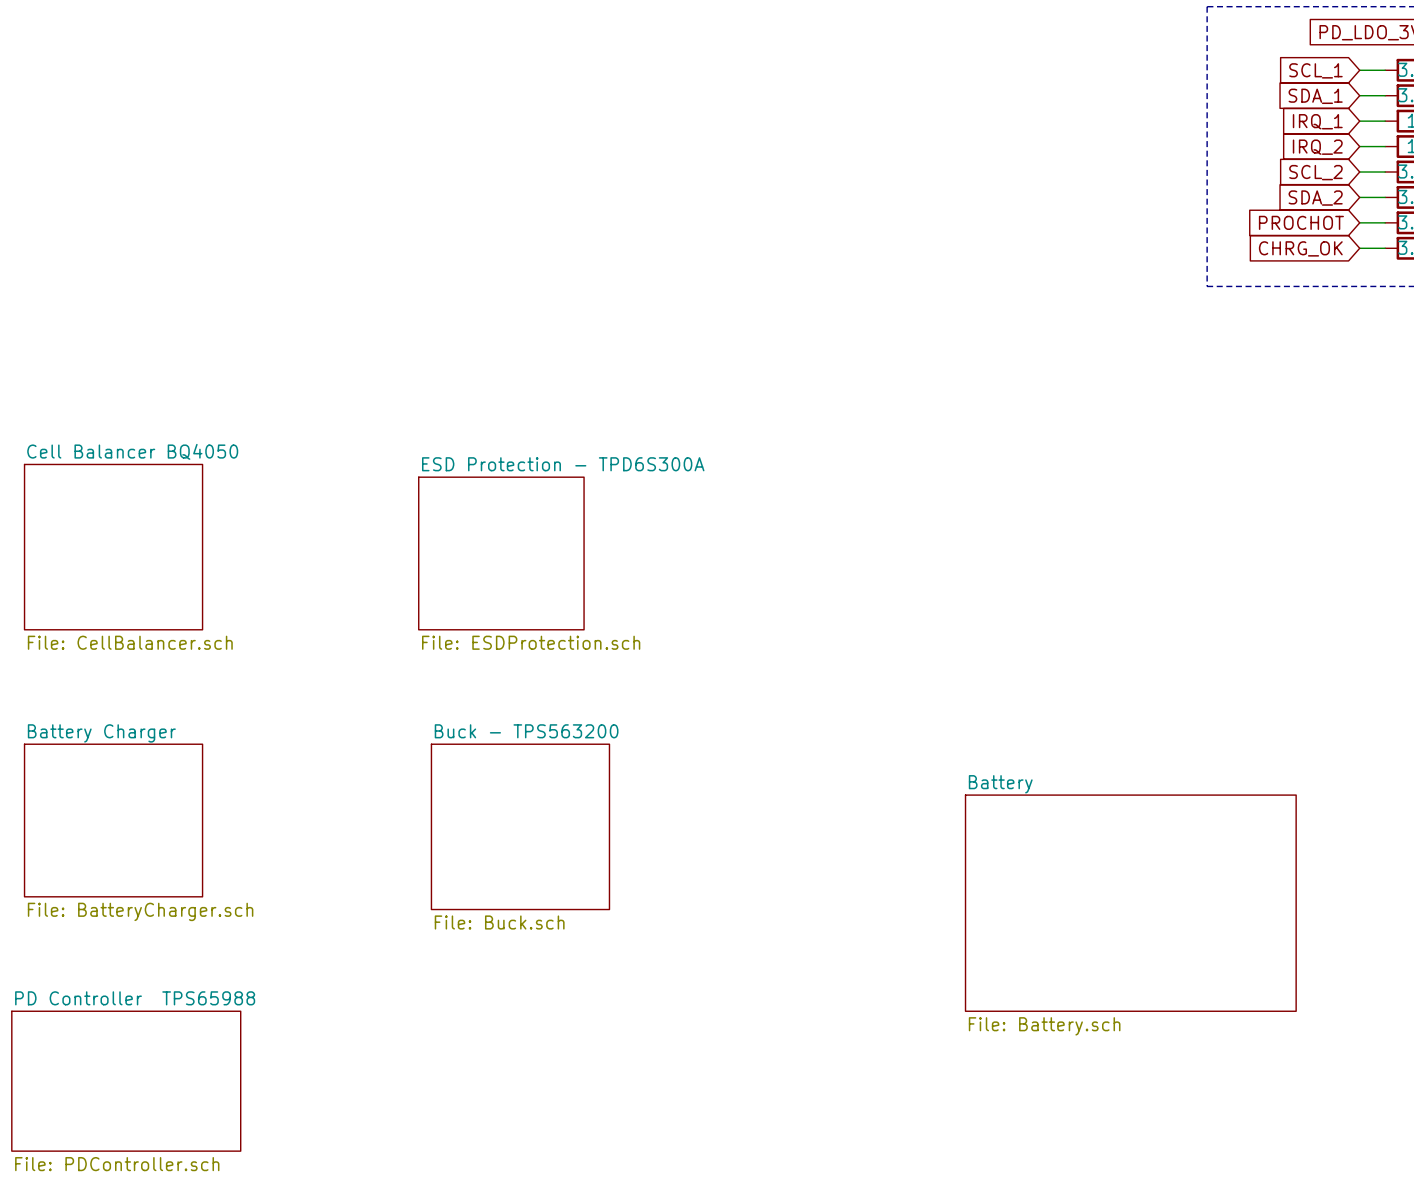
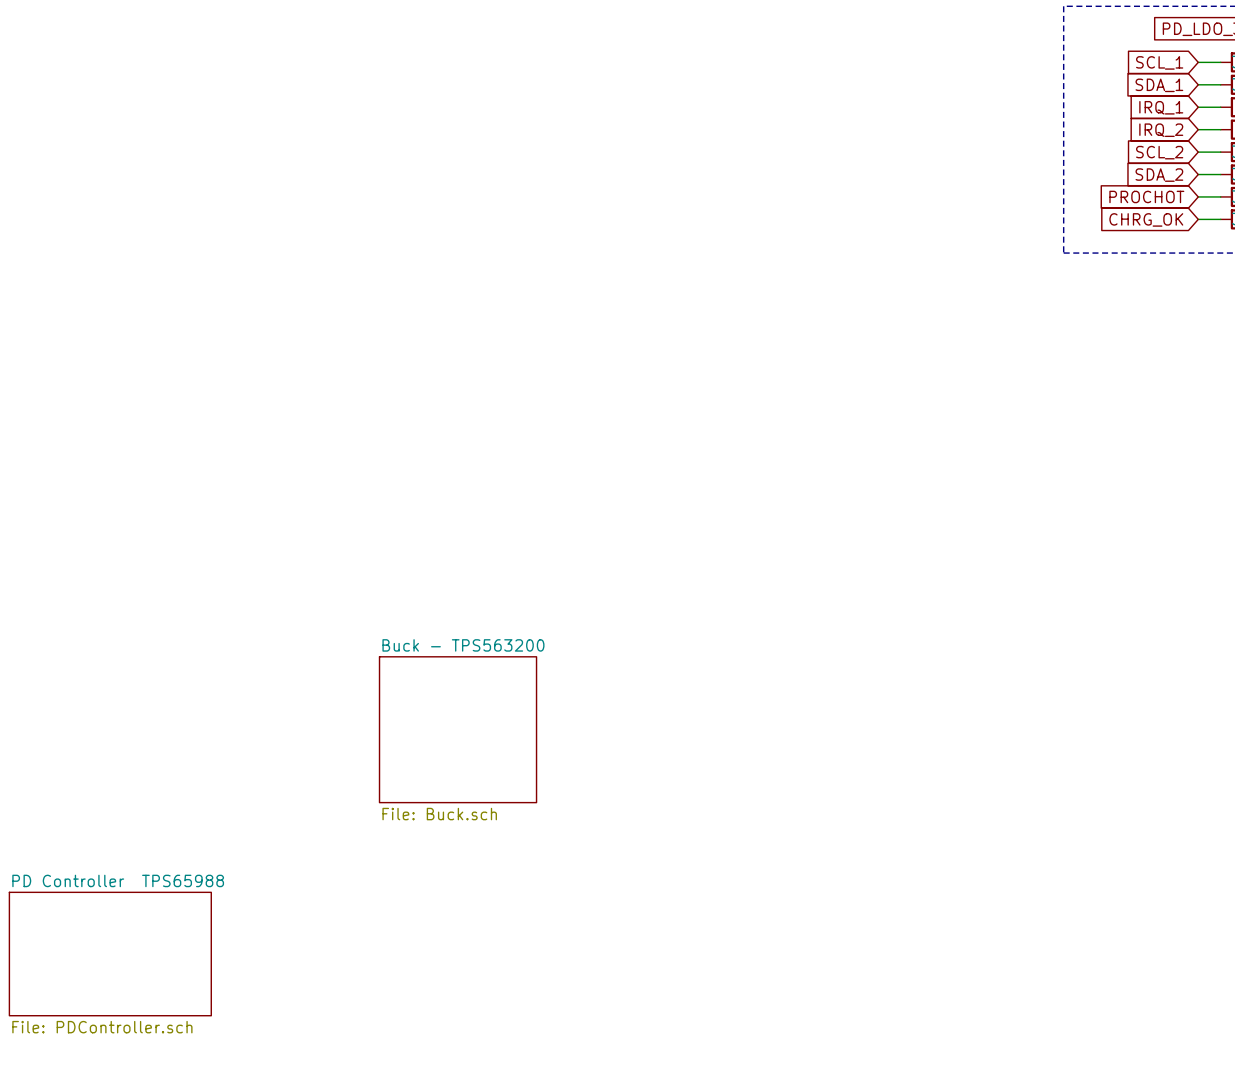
sheet Cell Balancer BQ4050: File: CellBalancer.sch (113, 547) -> none
sheet ESD Protection - TPD6S300A: File: ESDProtection.sch (501, 553) -> none
sheet Battery Charger: File: BatteryCharger.sch (113, 820) -> none
sheet Battery: File: Battery.sch (1130, 903) -> none

